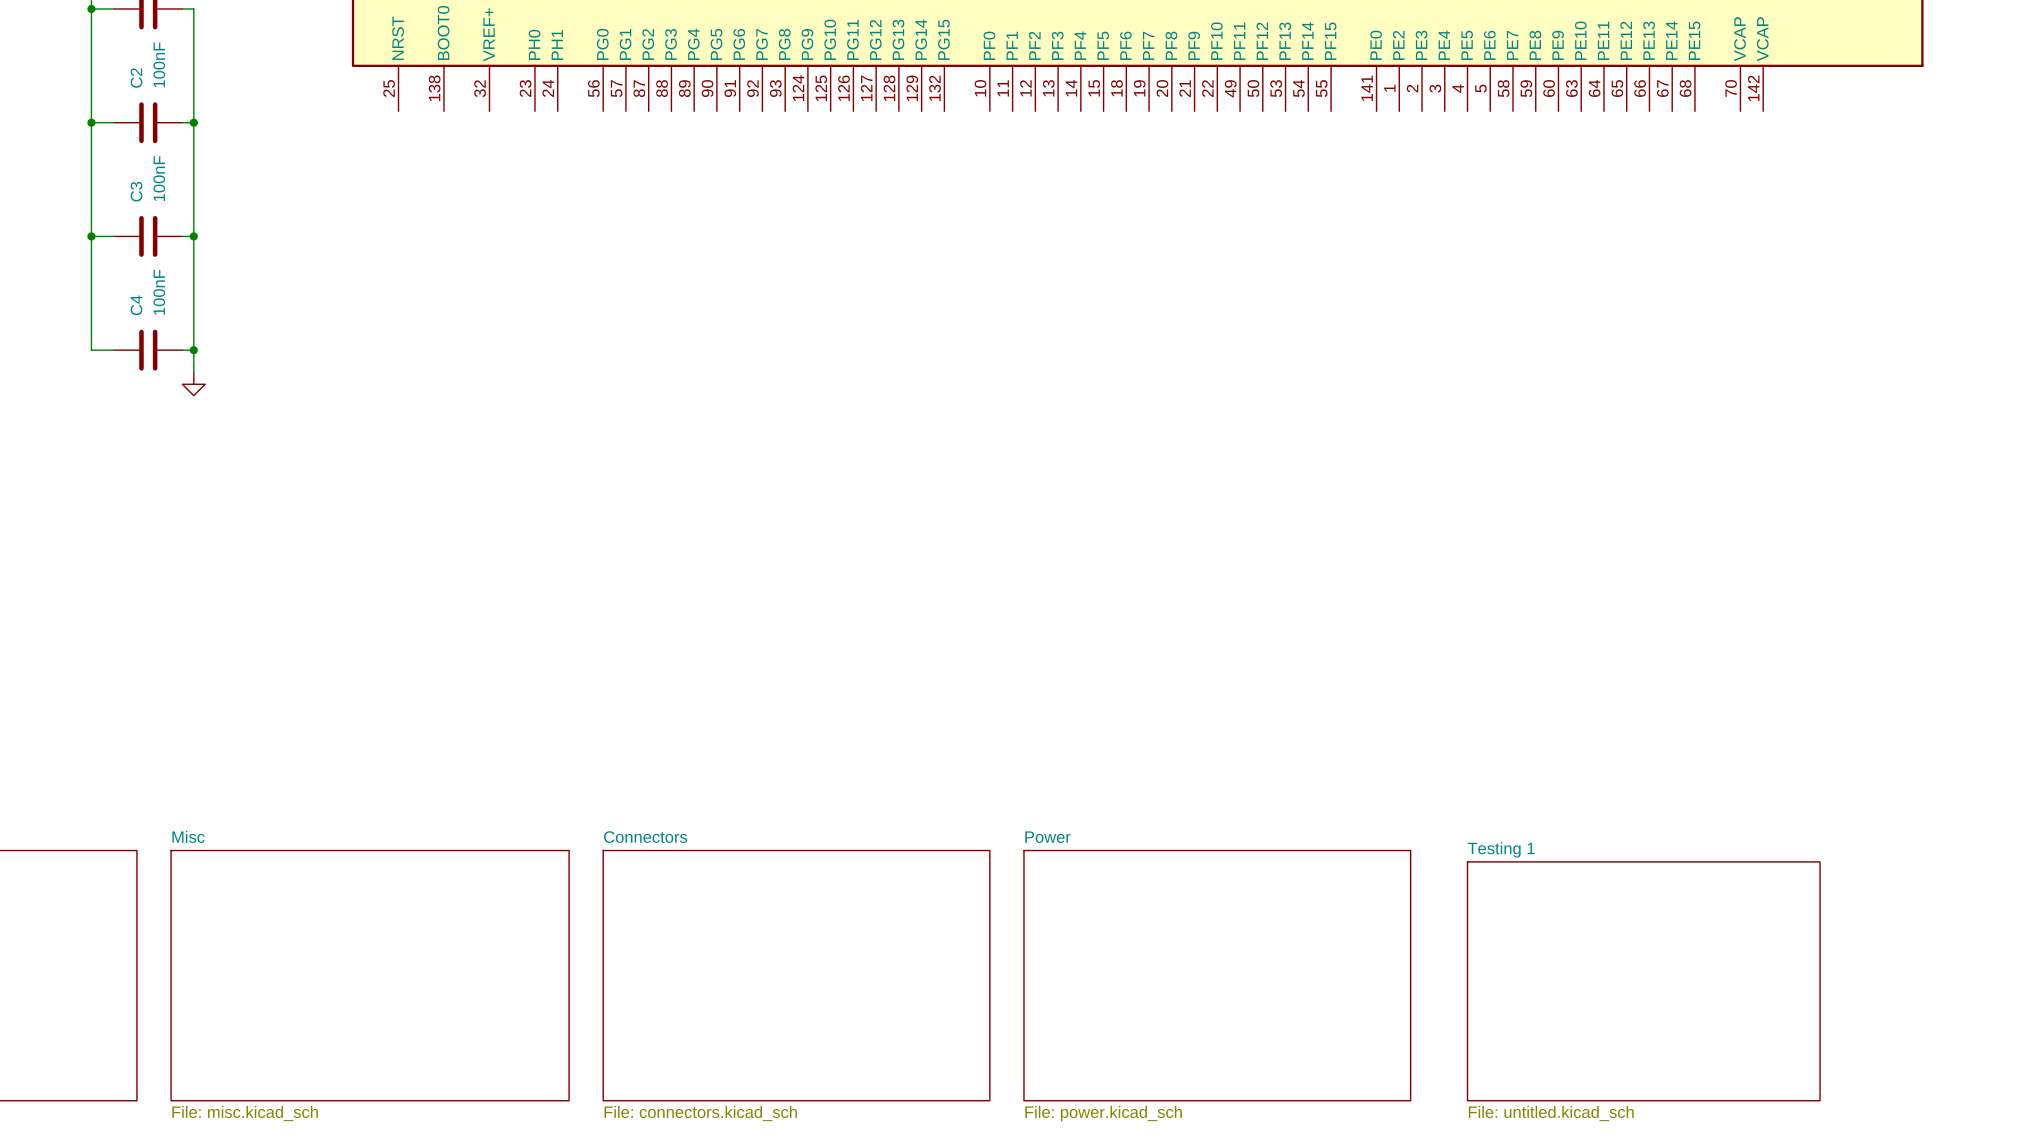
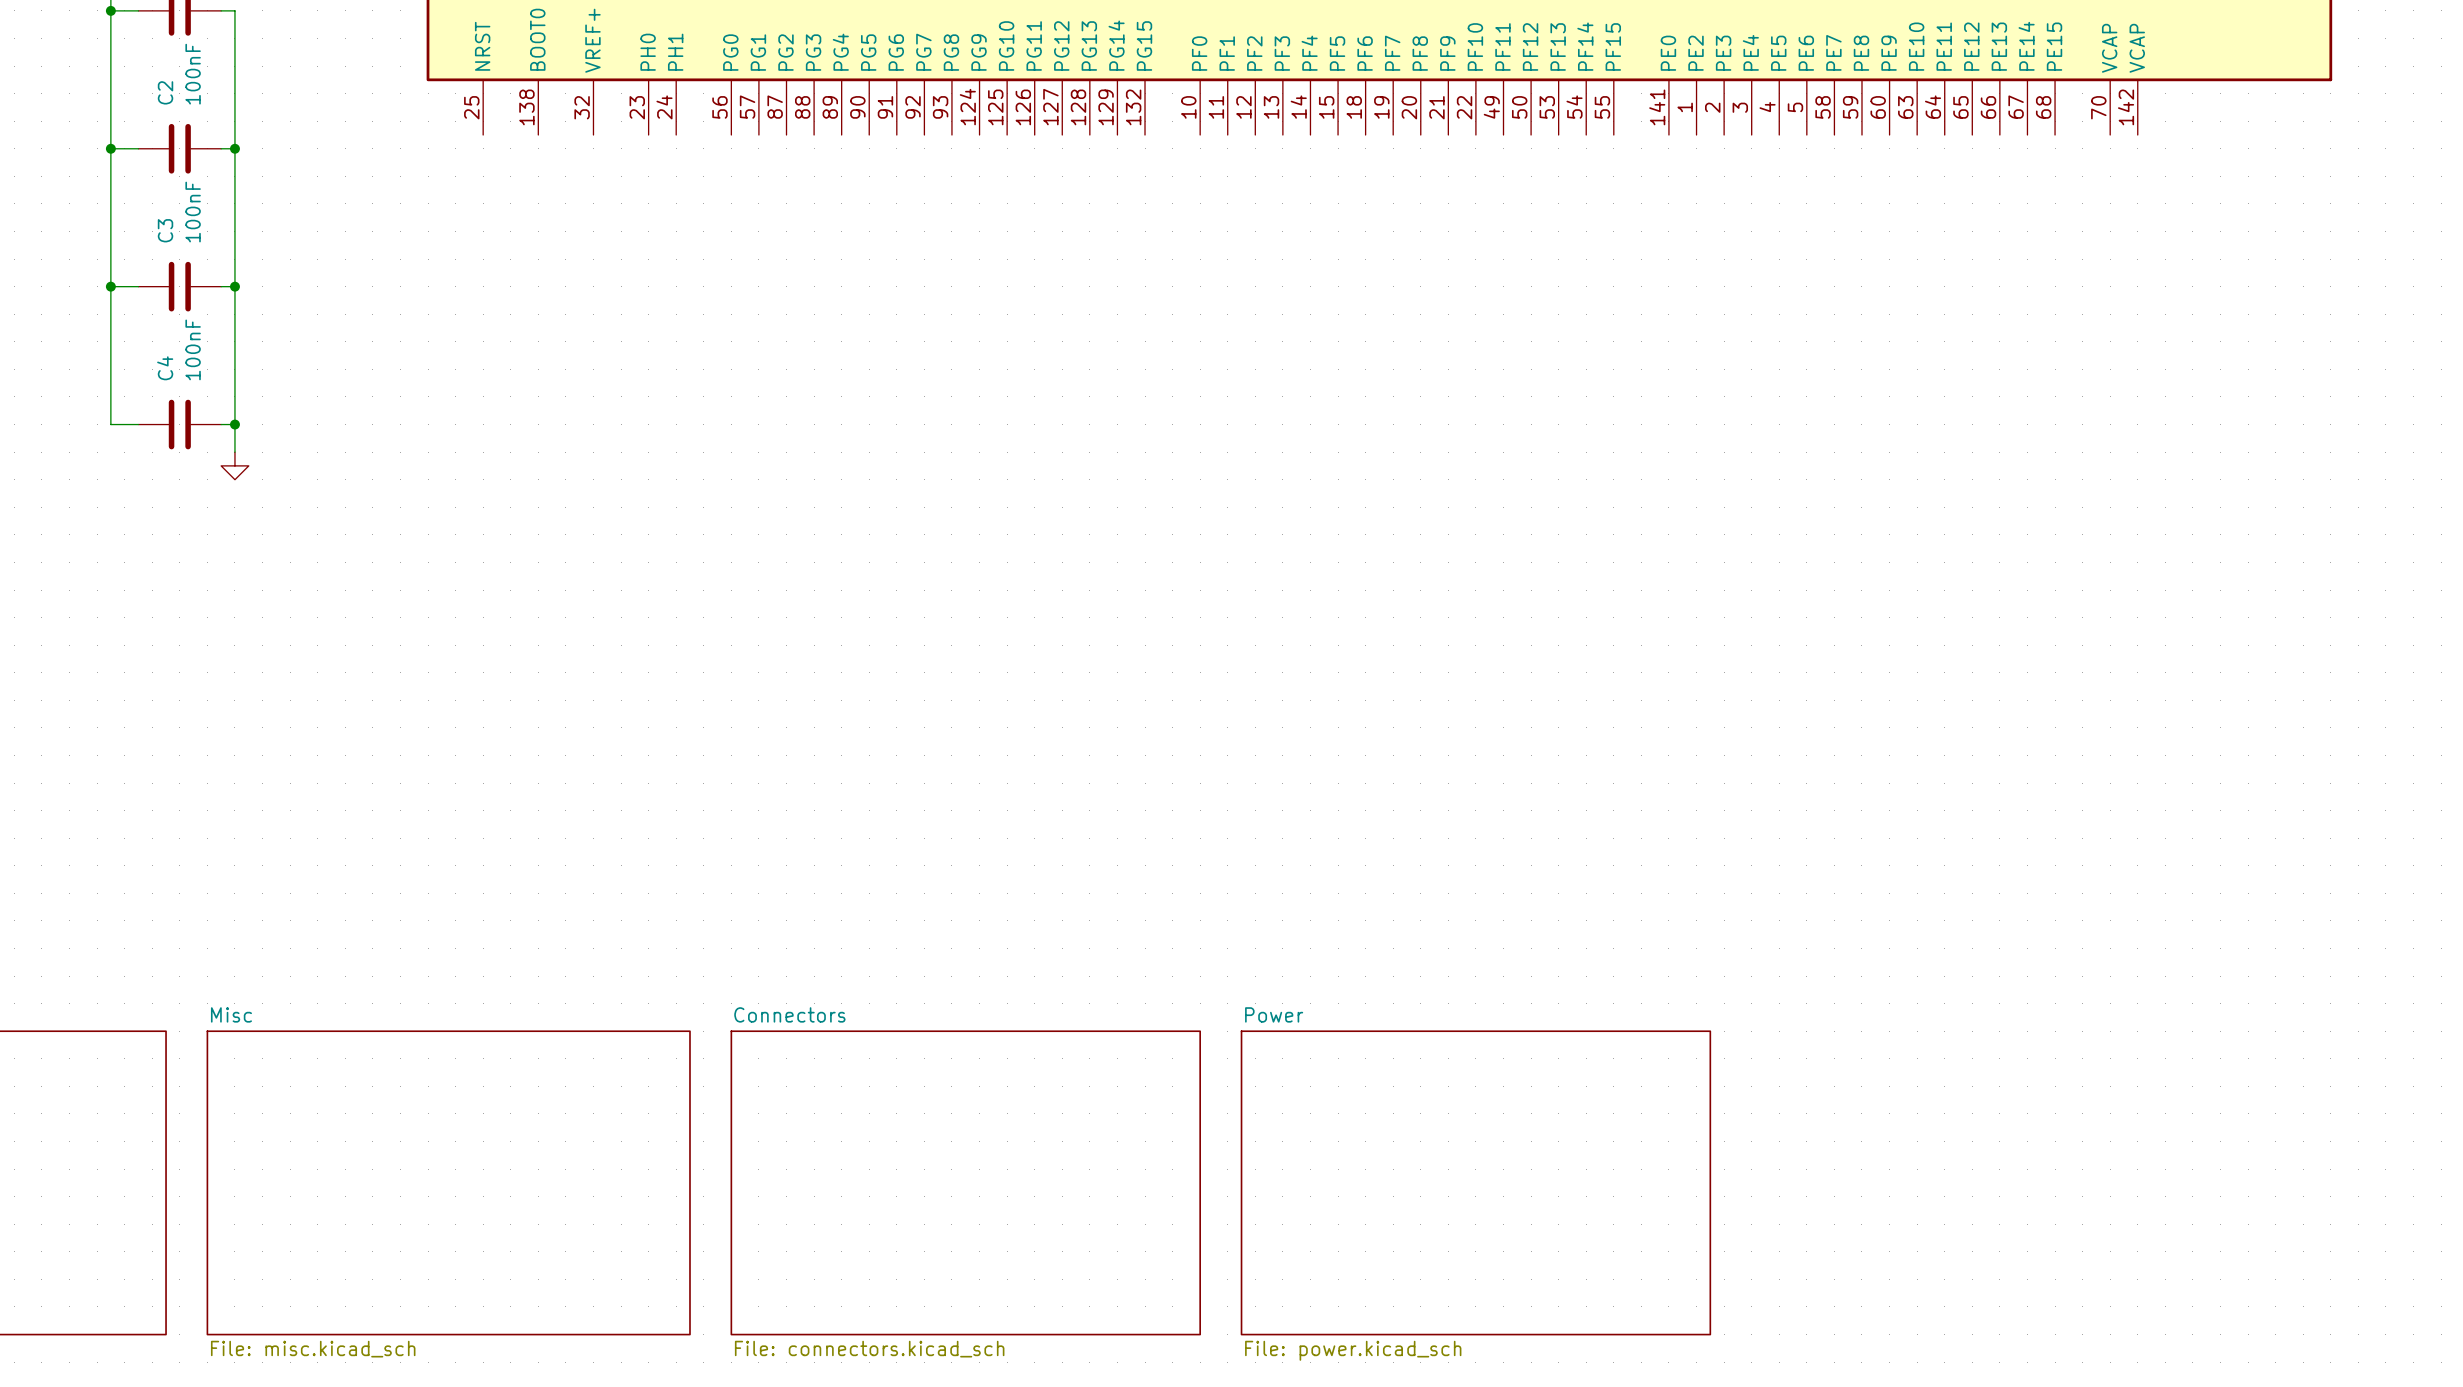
sheet Testing 1: File: untitled.kicad_sch (1643, 981) -> none

